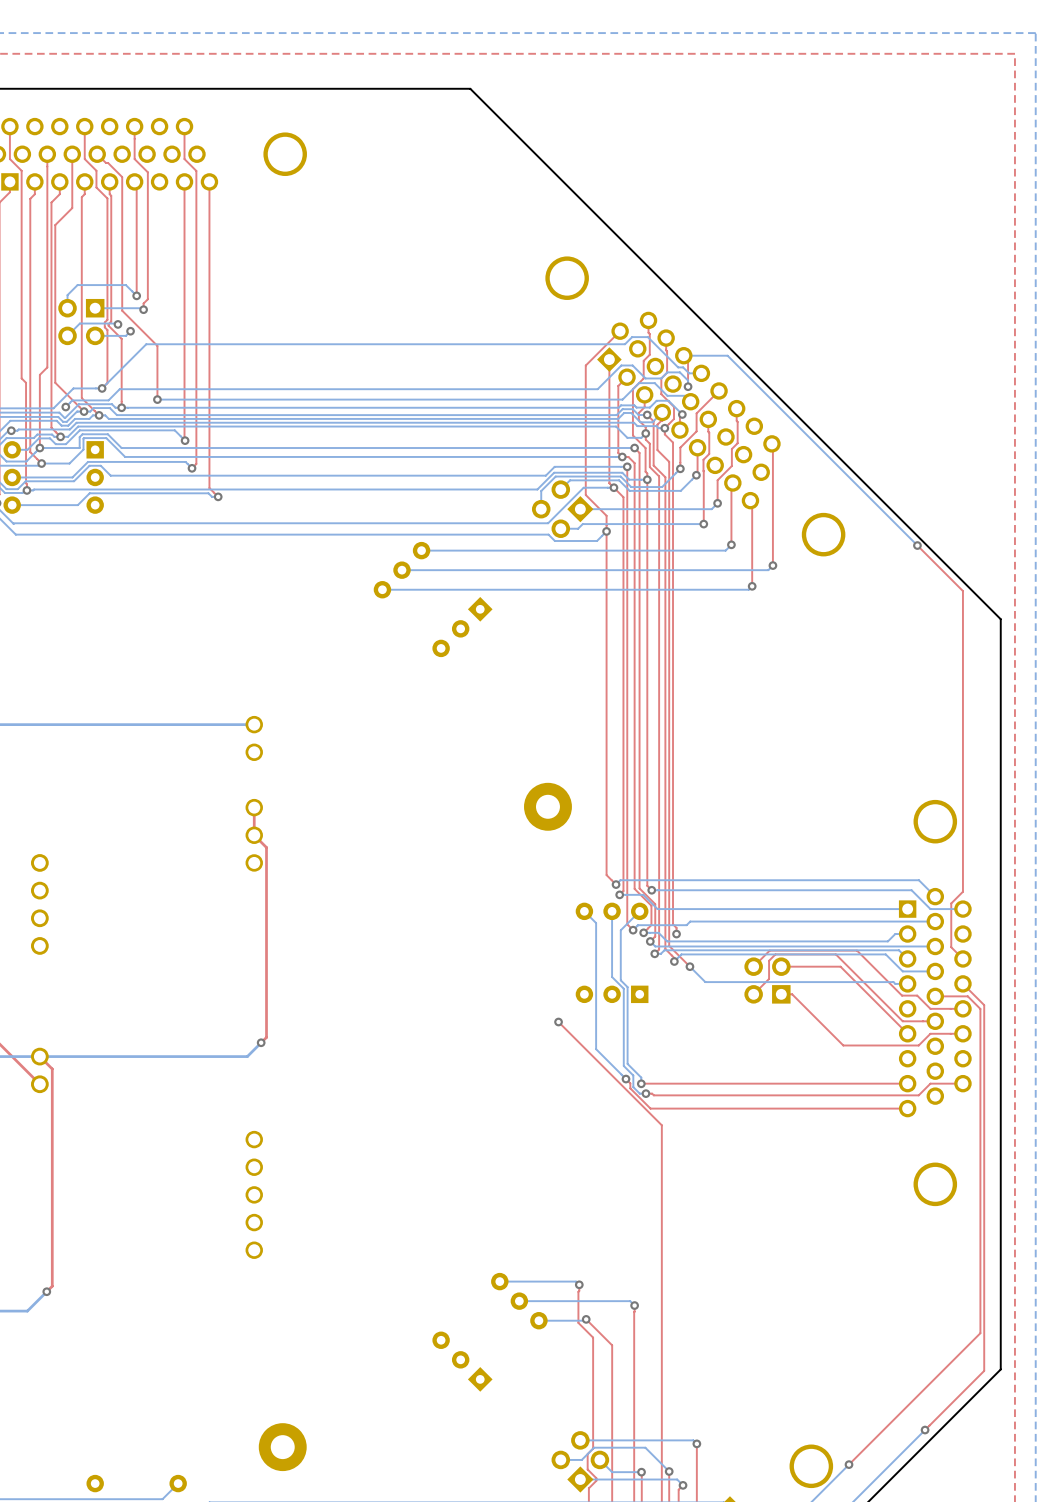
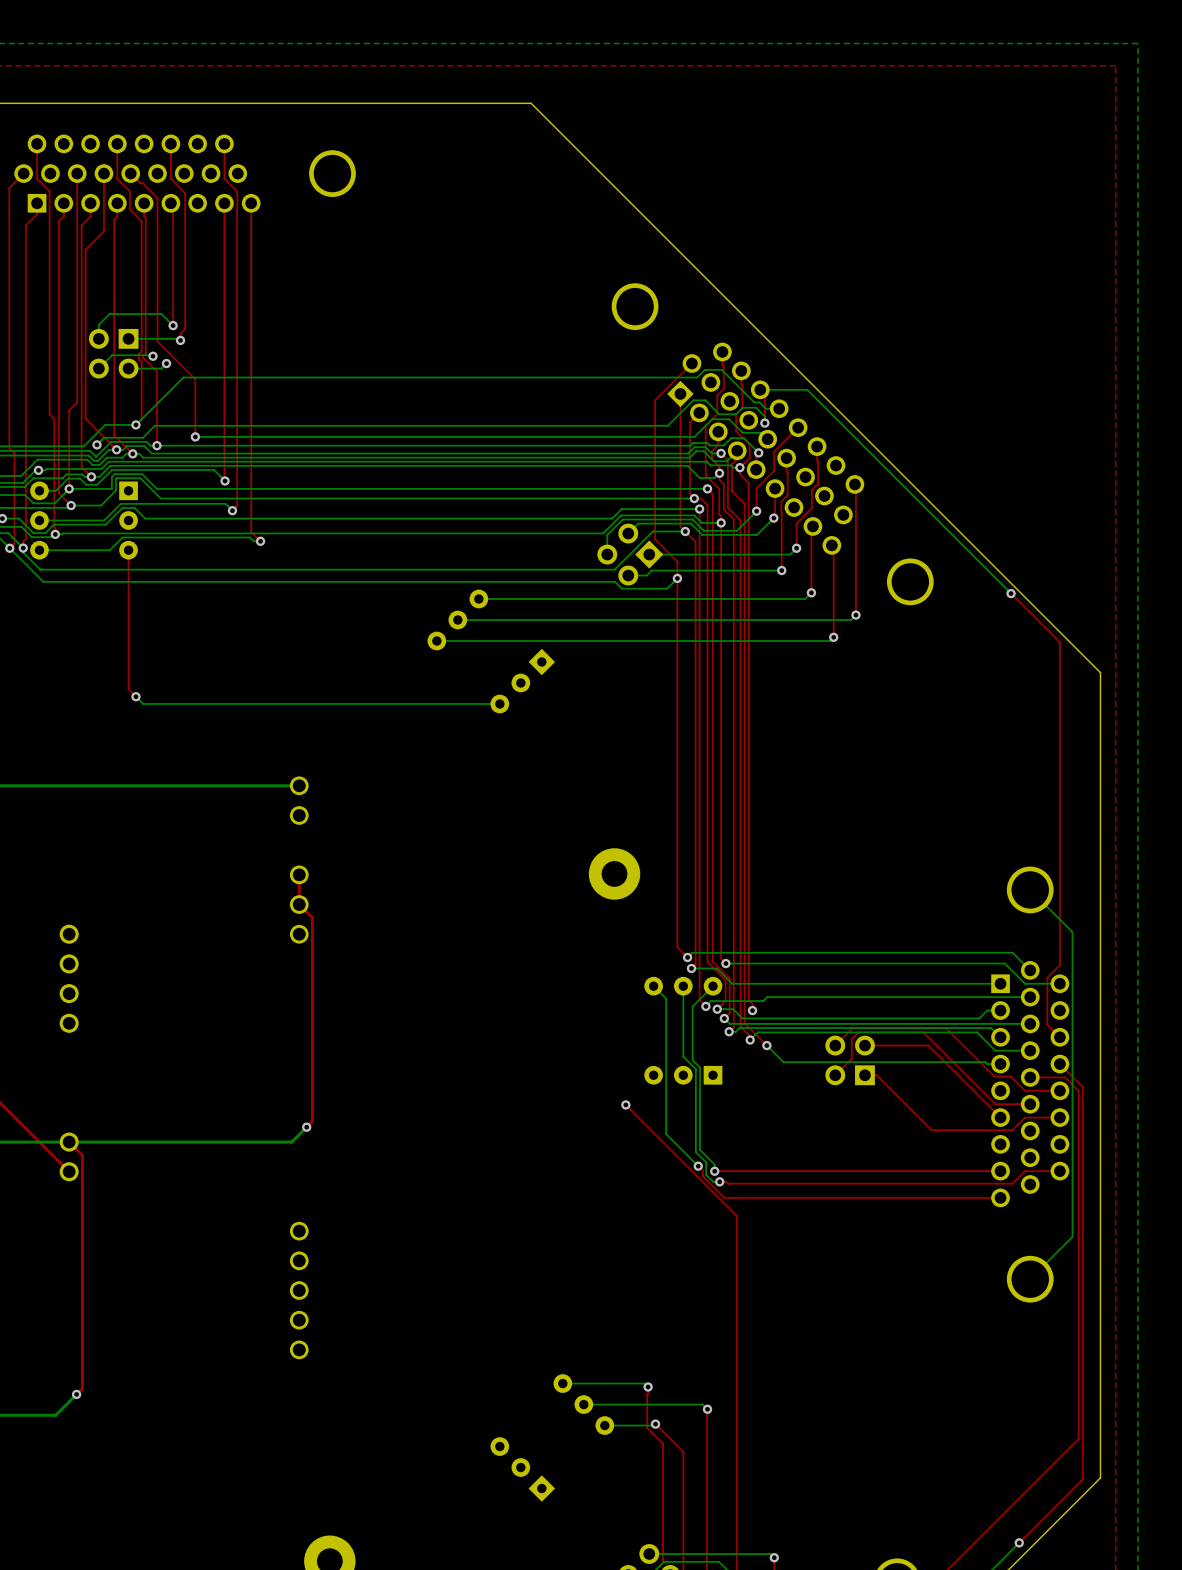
top track: none -> (128, 550) (128, 689) (135, 696)
bottom track: none -> (135, 696) (143, 703) (499, 703)
via: none -> (135, 696)
bottom track: none -> (1030, 889) (1072, 932) (1072, 1236) (1030, 1279)

